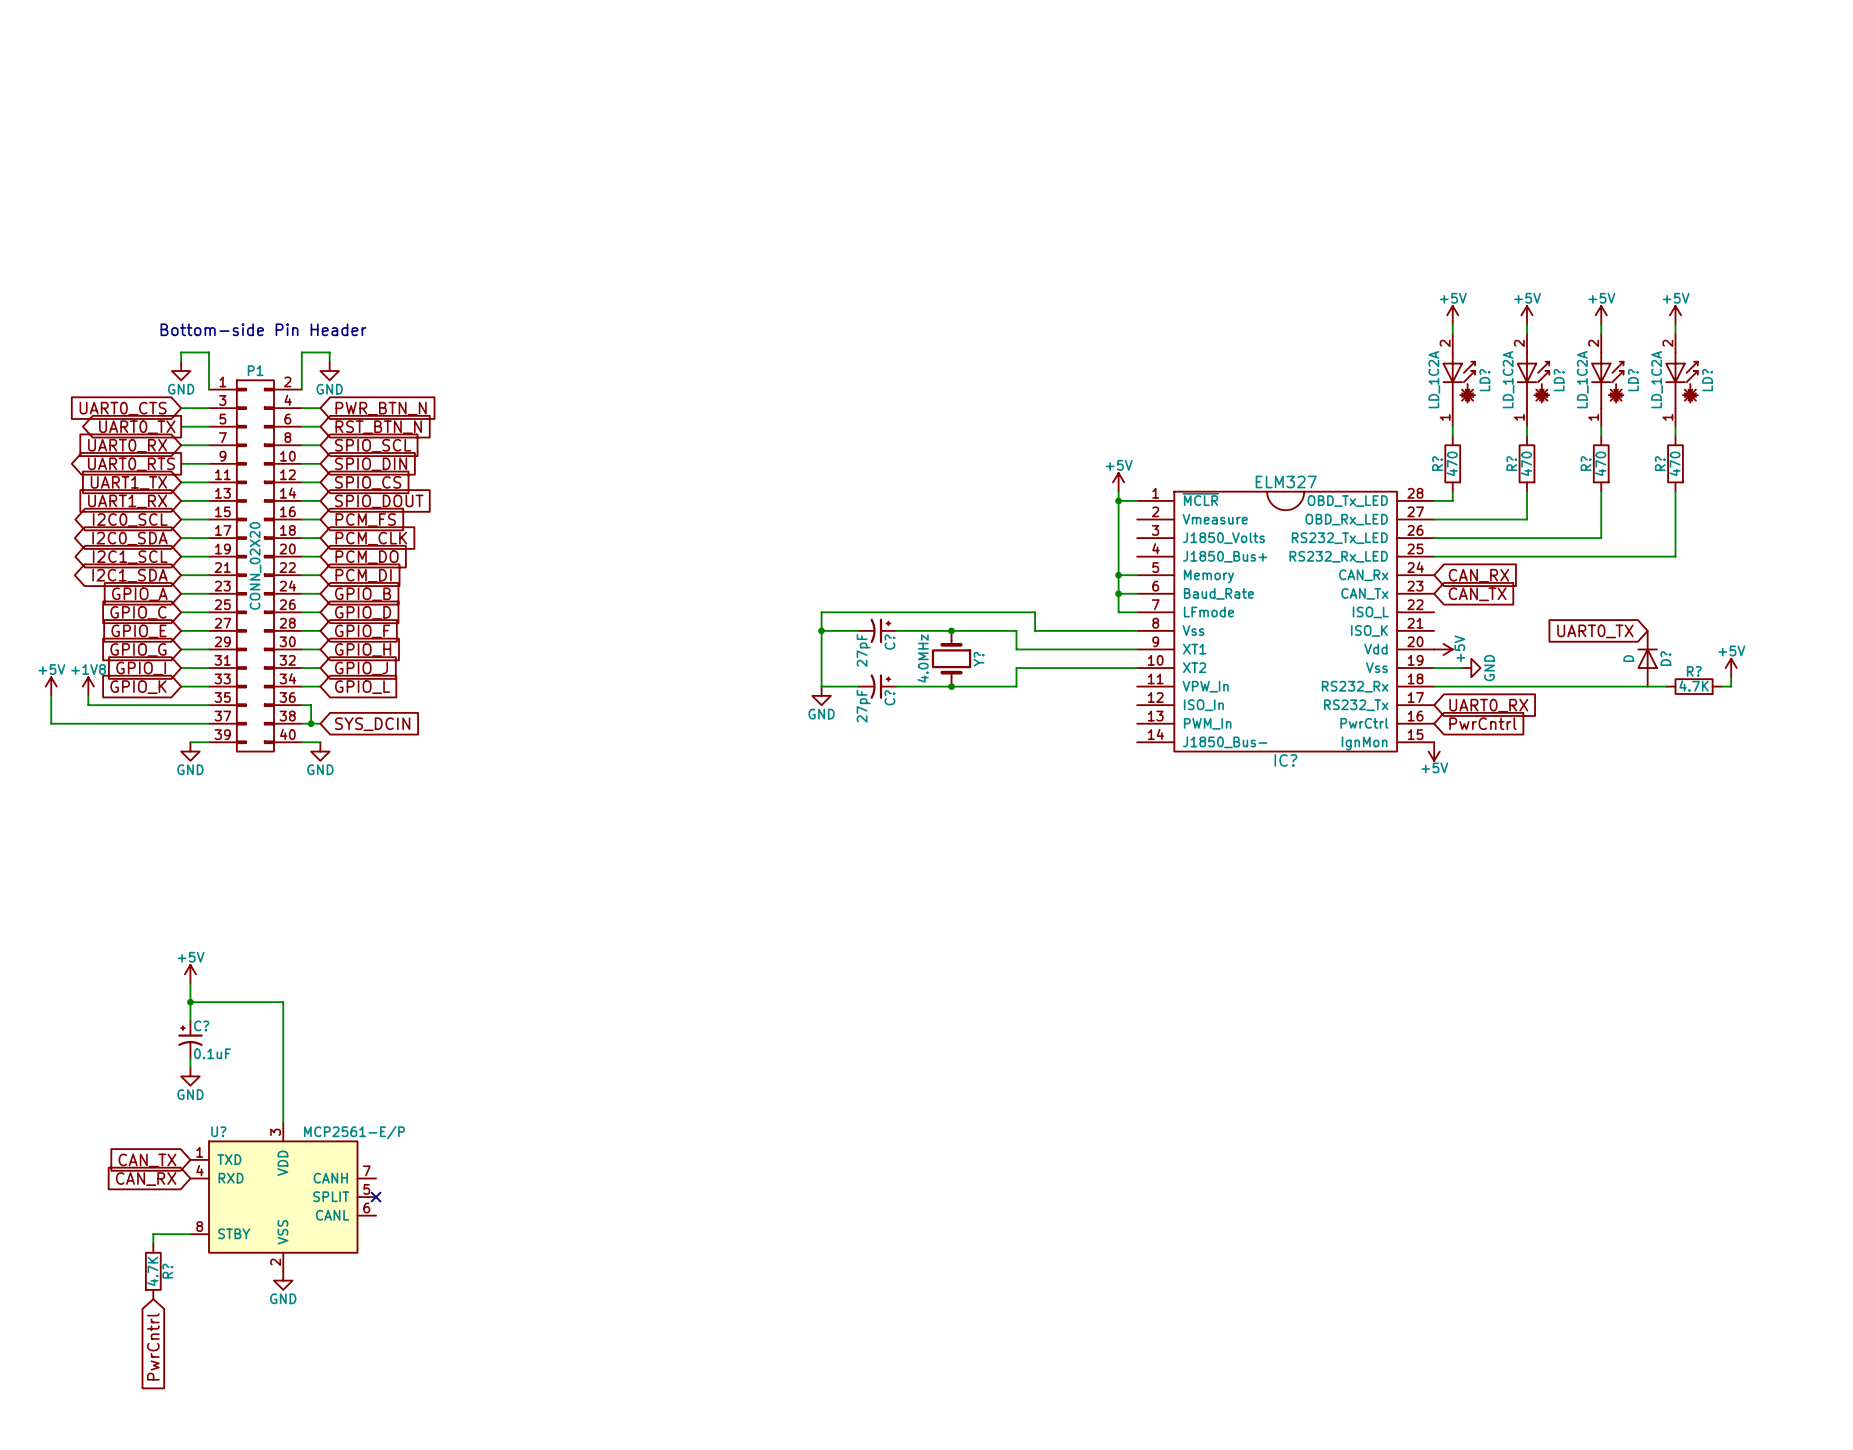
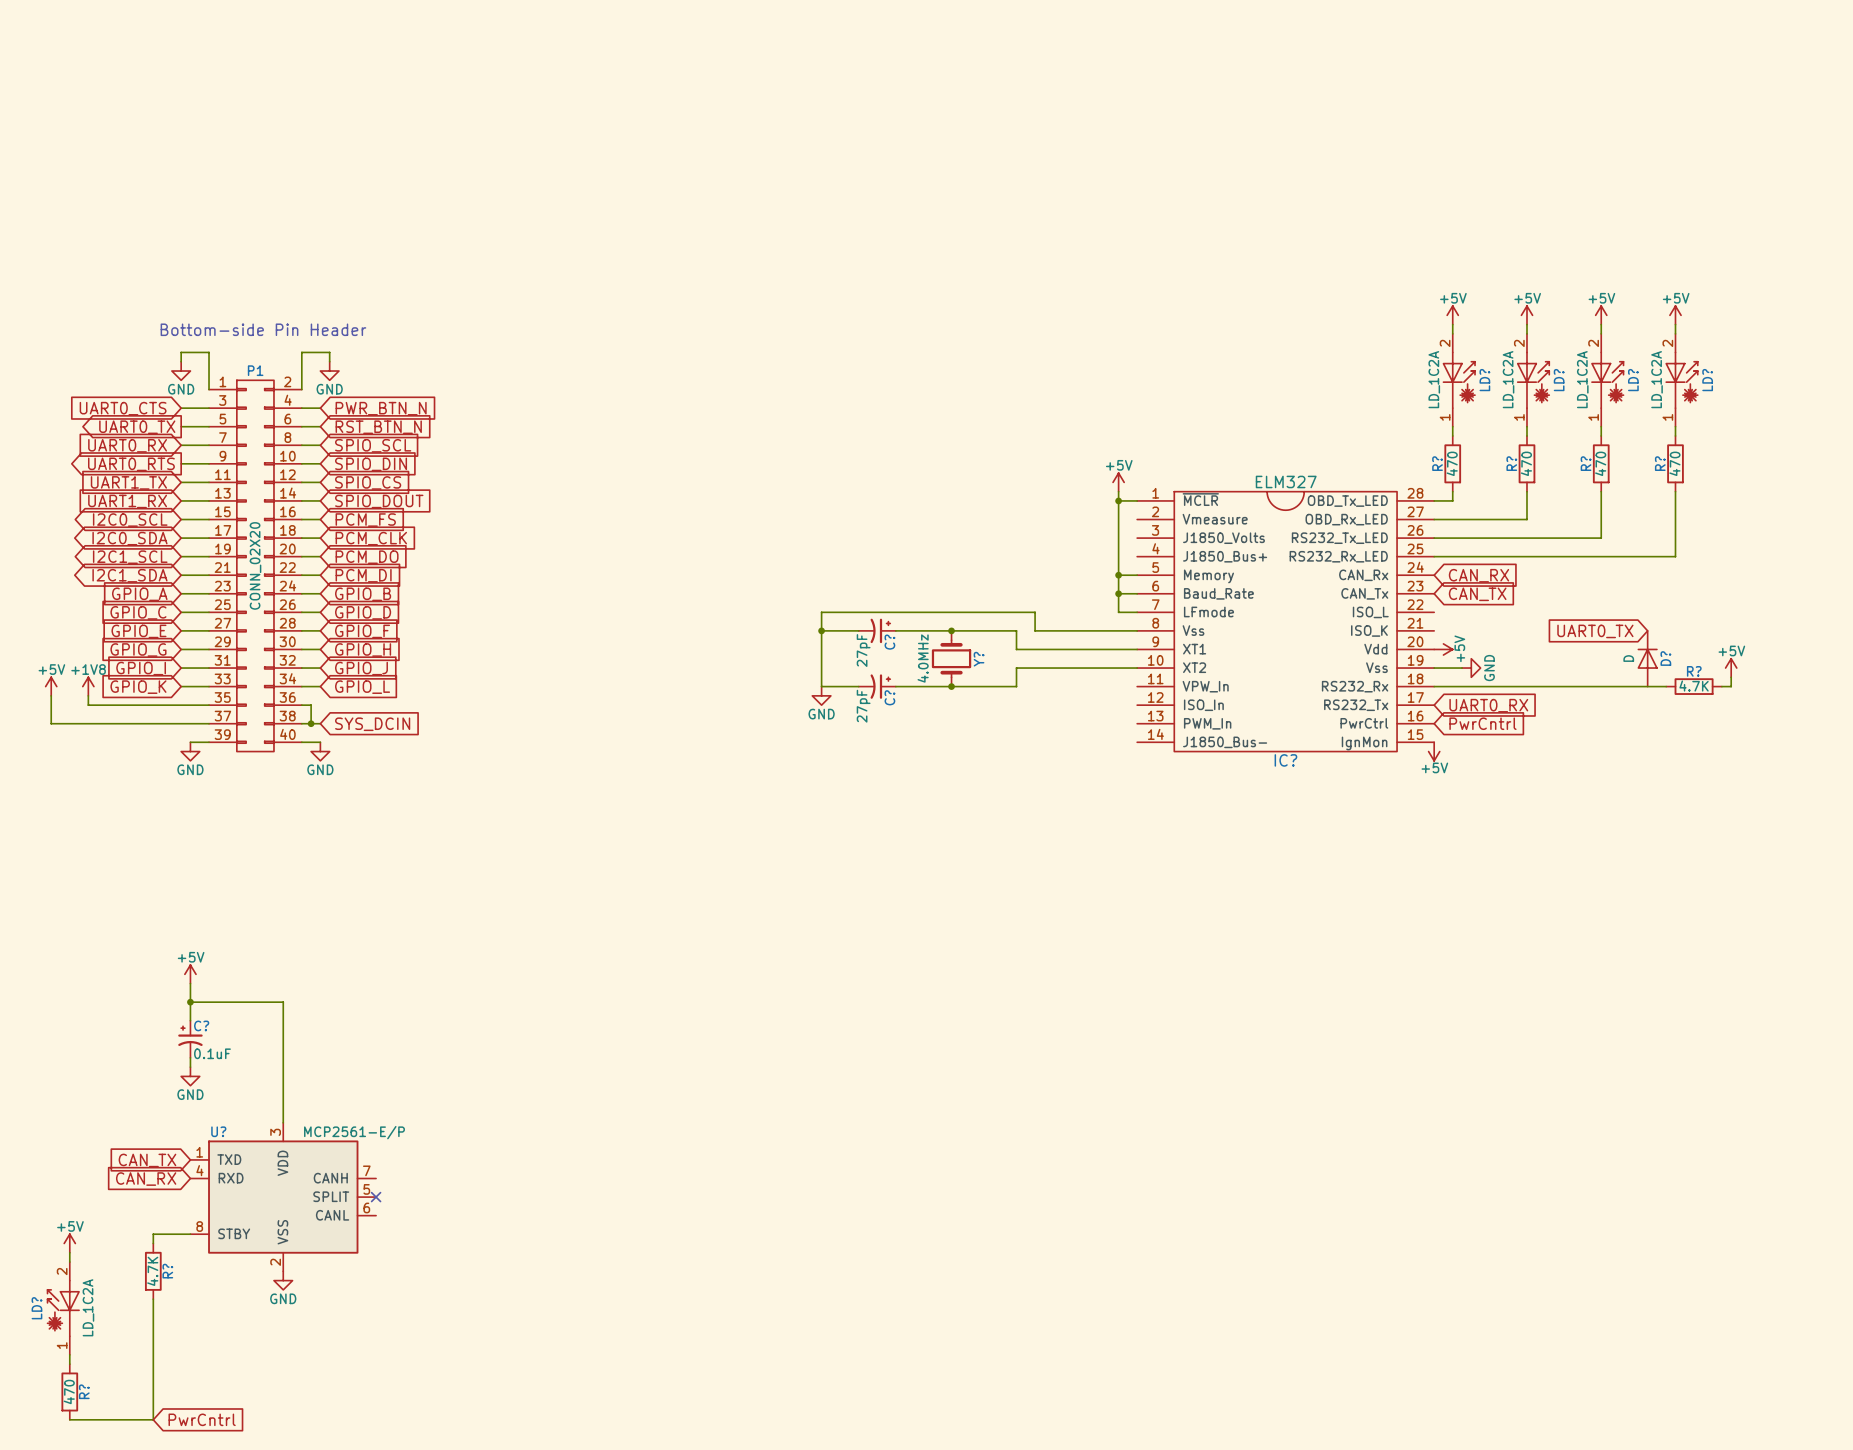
power symbol: none -> +5V (69, 1243)
wire: none -> (69, 1252) (69, 1262)
wire: none -> (153, 1299) (153, 1419) (69, 1419)
LD?: none -> LD_1C2A (63, 1308)
global label rotation: 0° (153, 1346) -> 90° counterclockwise (202, 1419)
wire: none -> (69, 1354) (69, 1364)
R?: none -> 470 (69, 1391)

